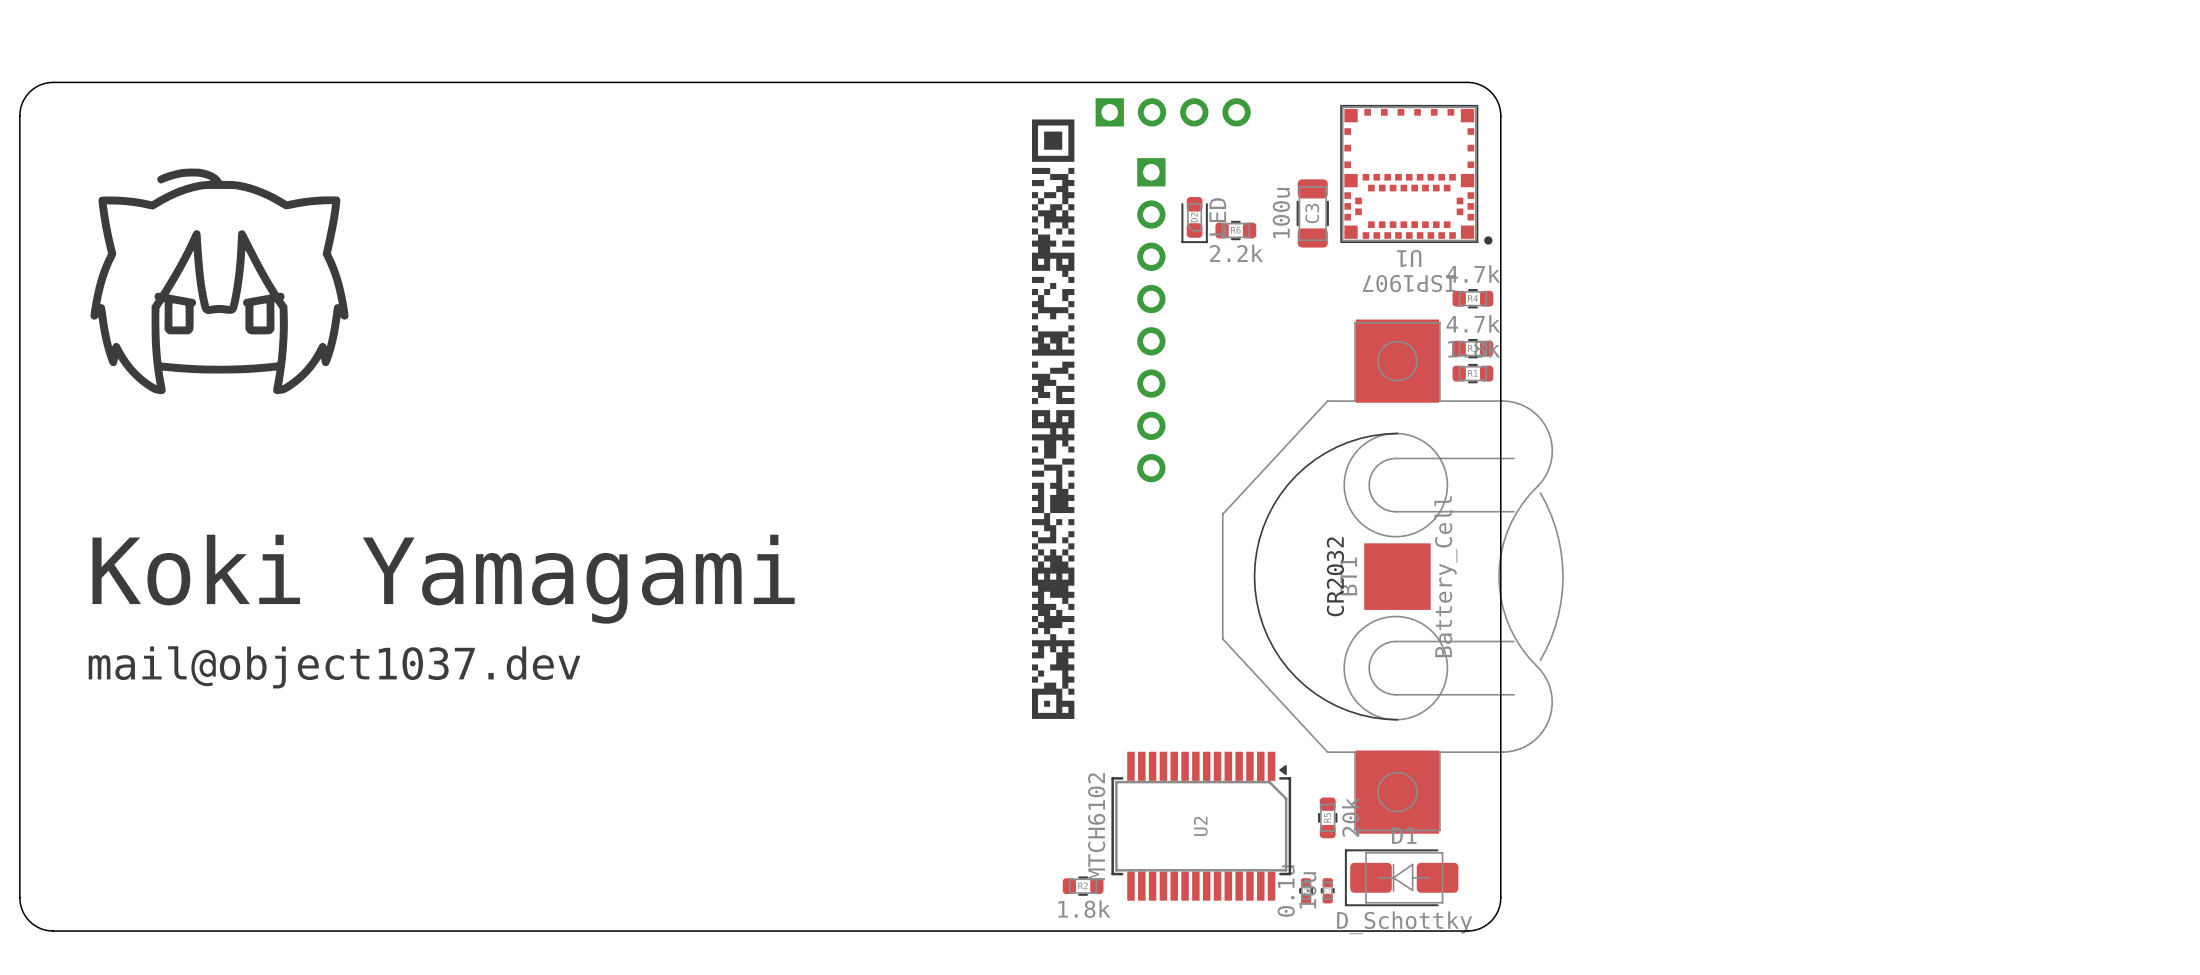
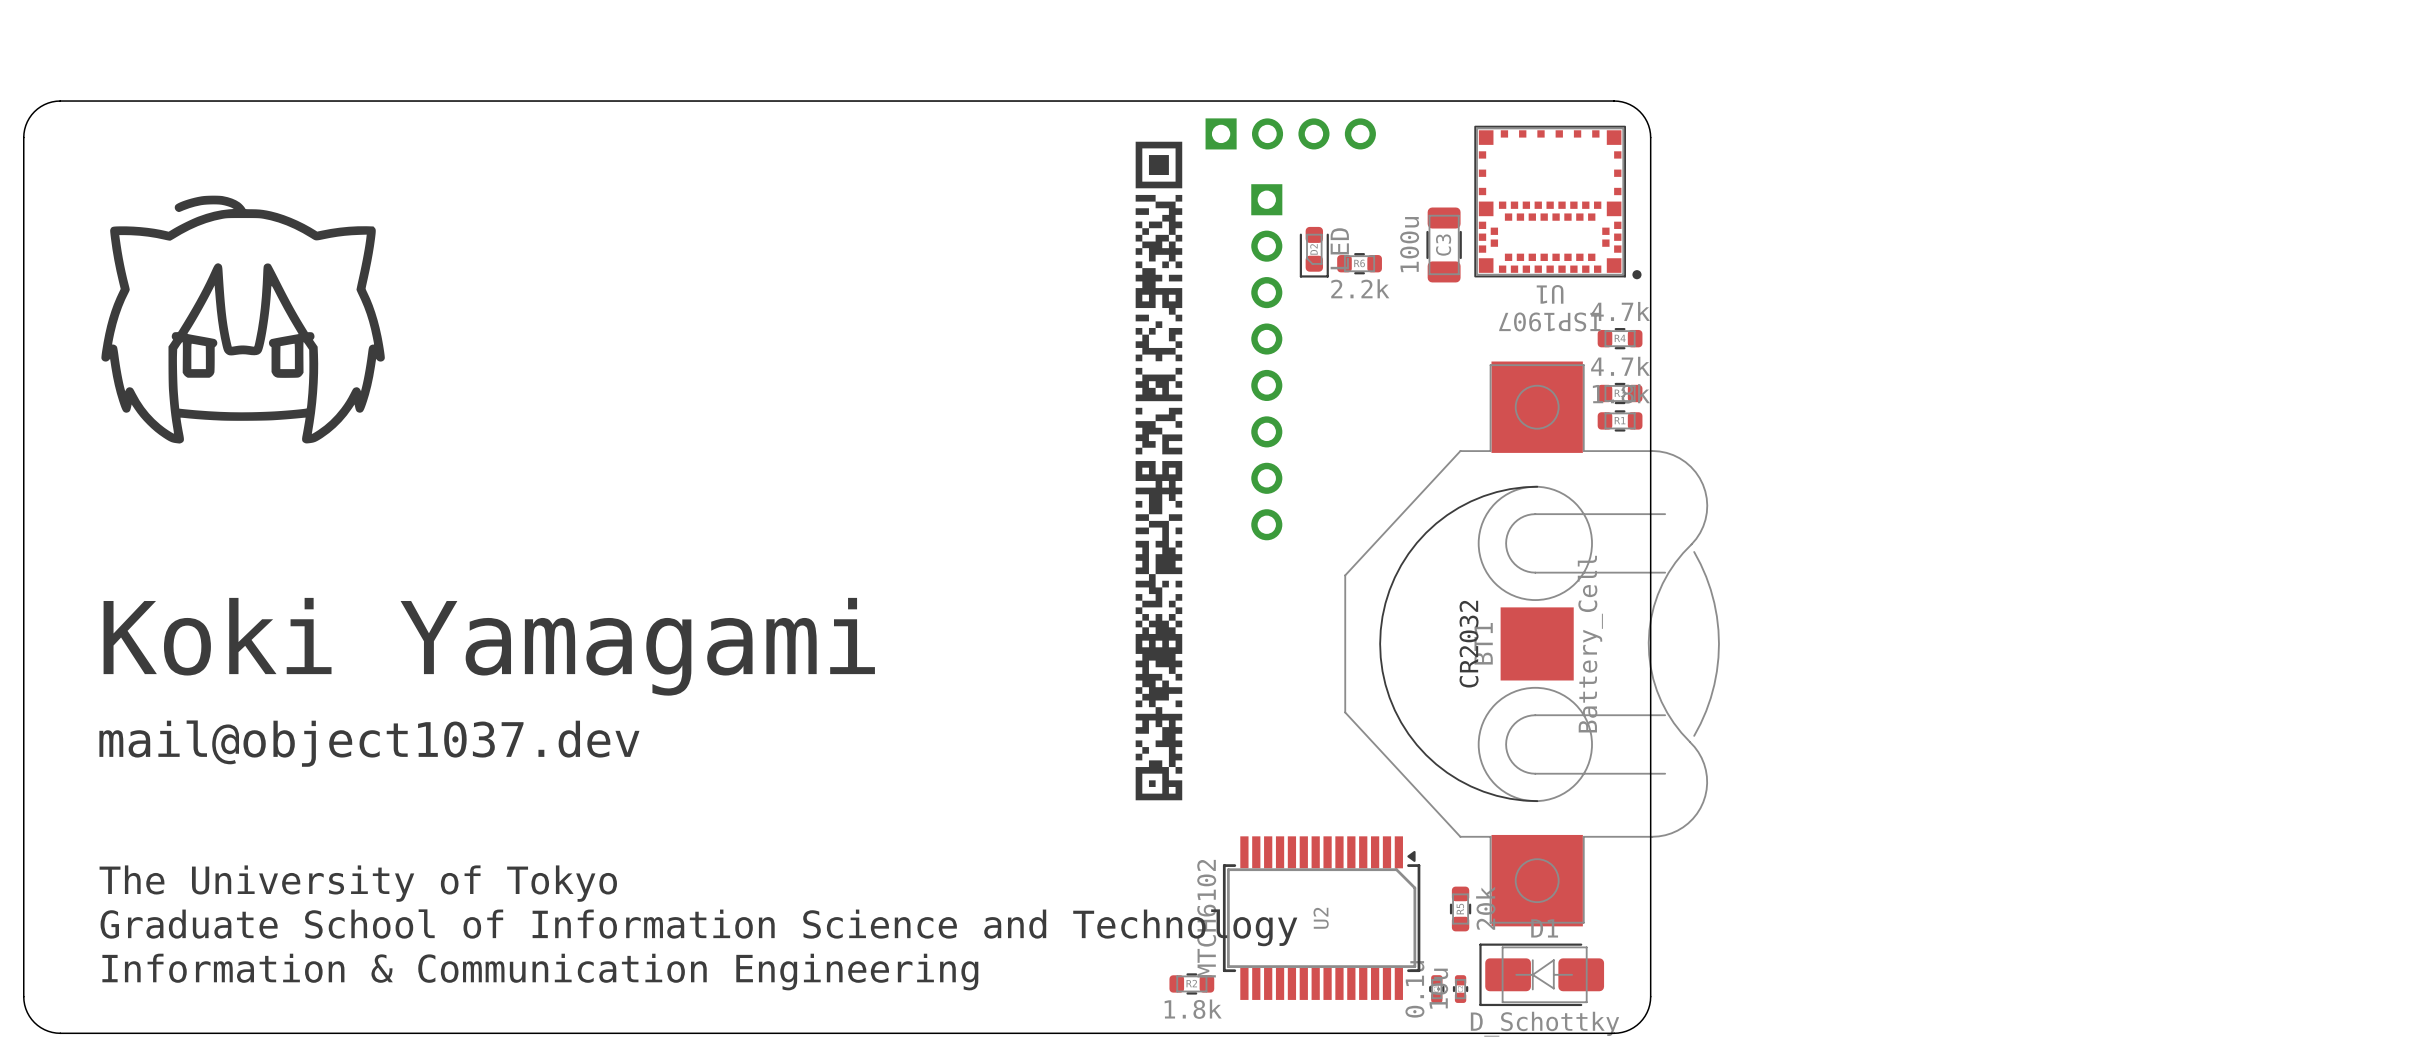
text: none -> The University of Tokyo (358, 883)
text: none -> Graduate School of Information Science and Technology (698, 927)
text: none -> Information & Communication Engineering (540, 972)

